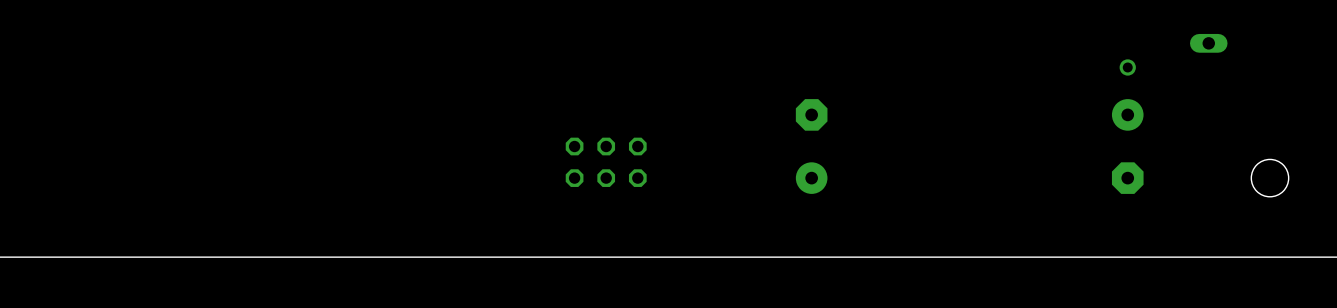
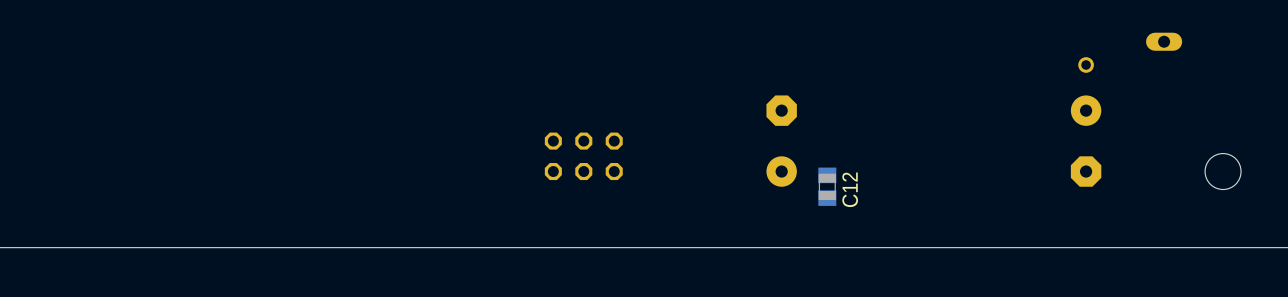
C12: none -> (827, 186)

